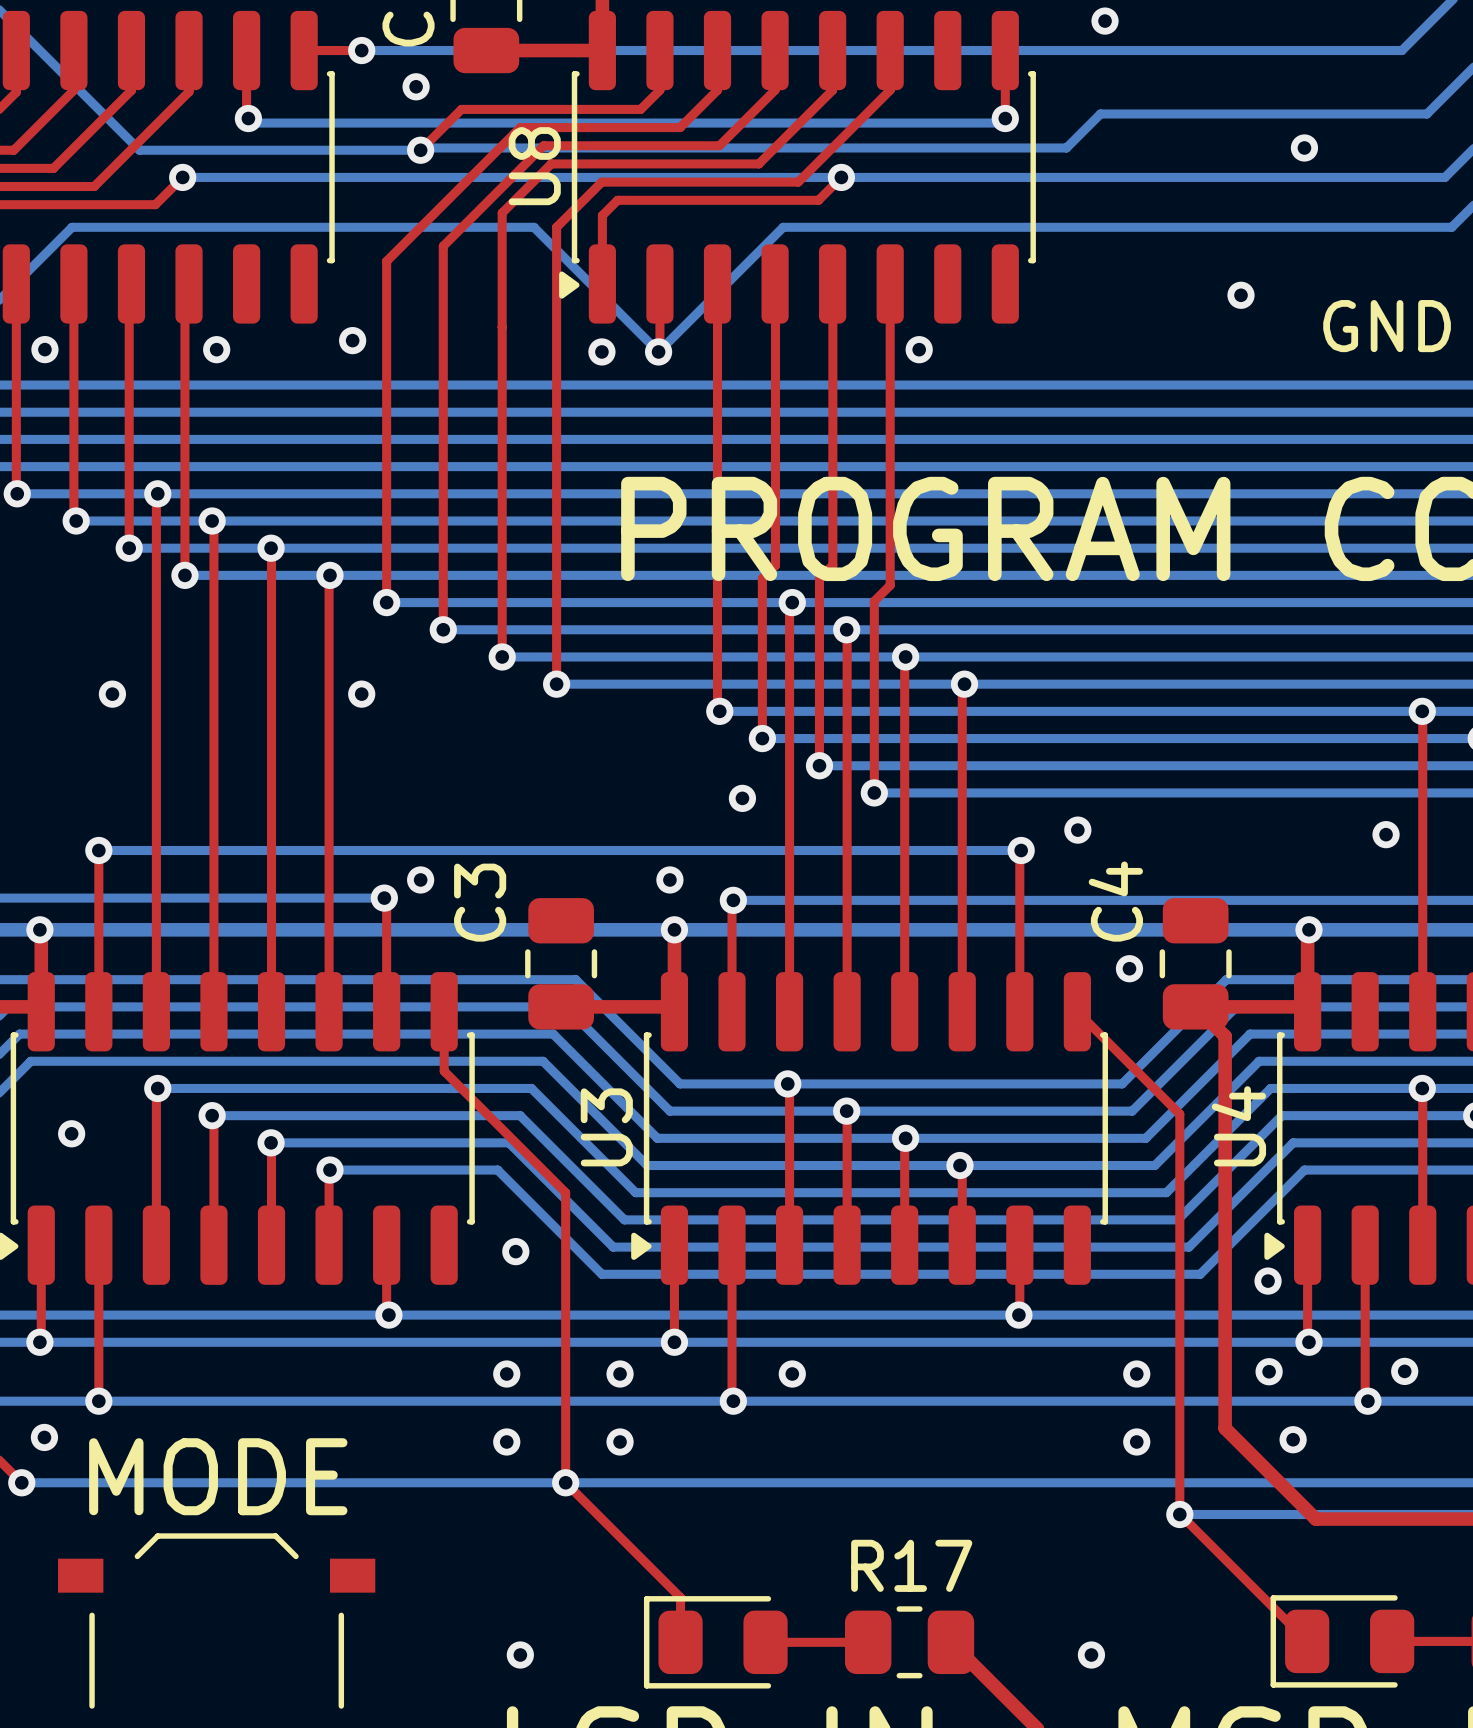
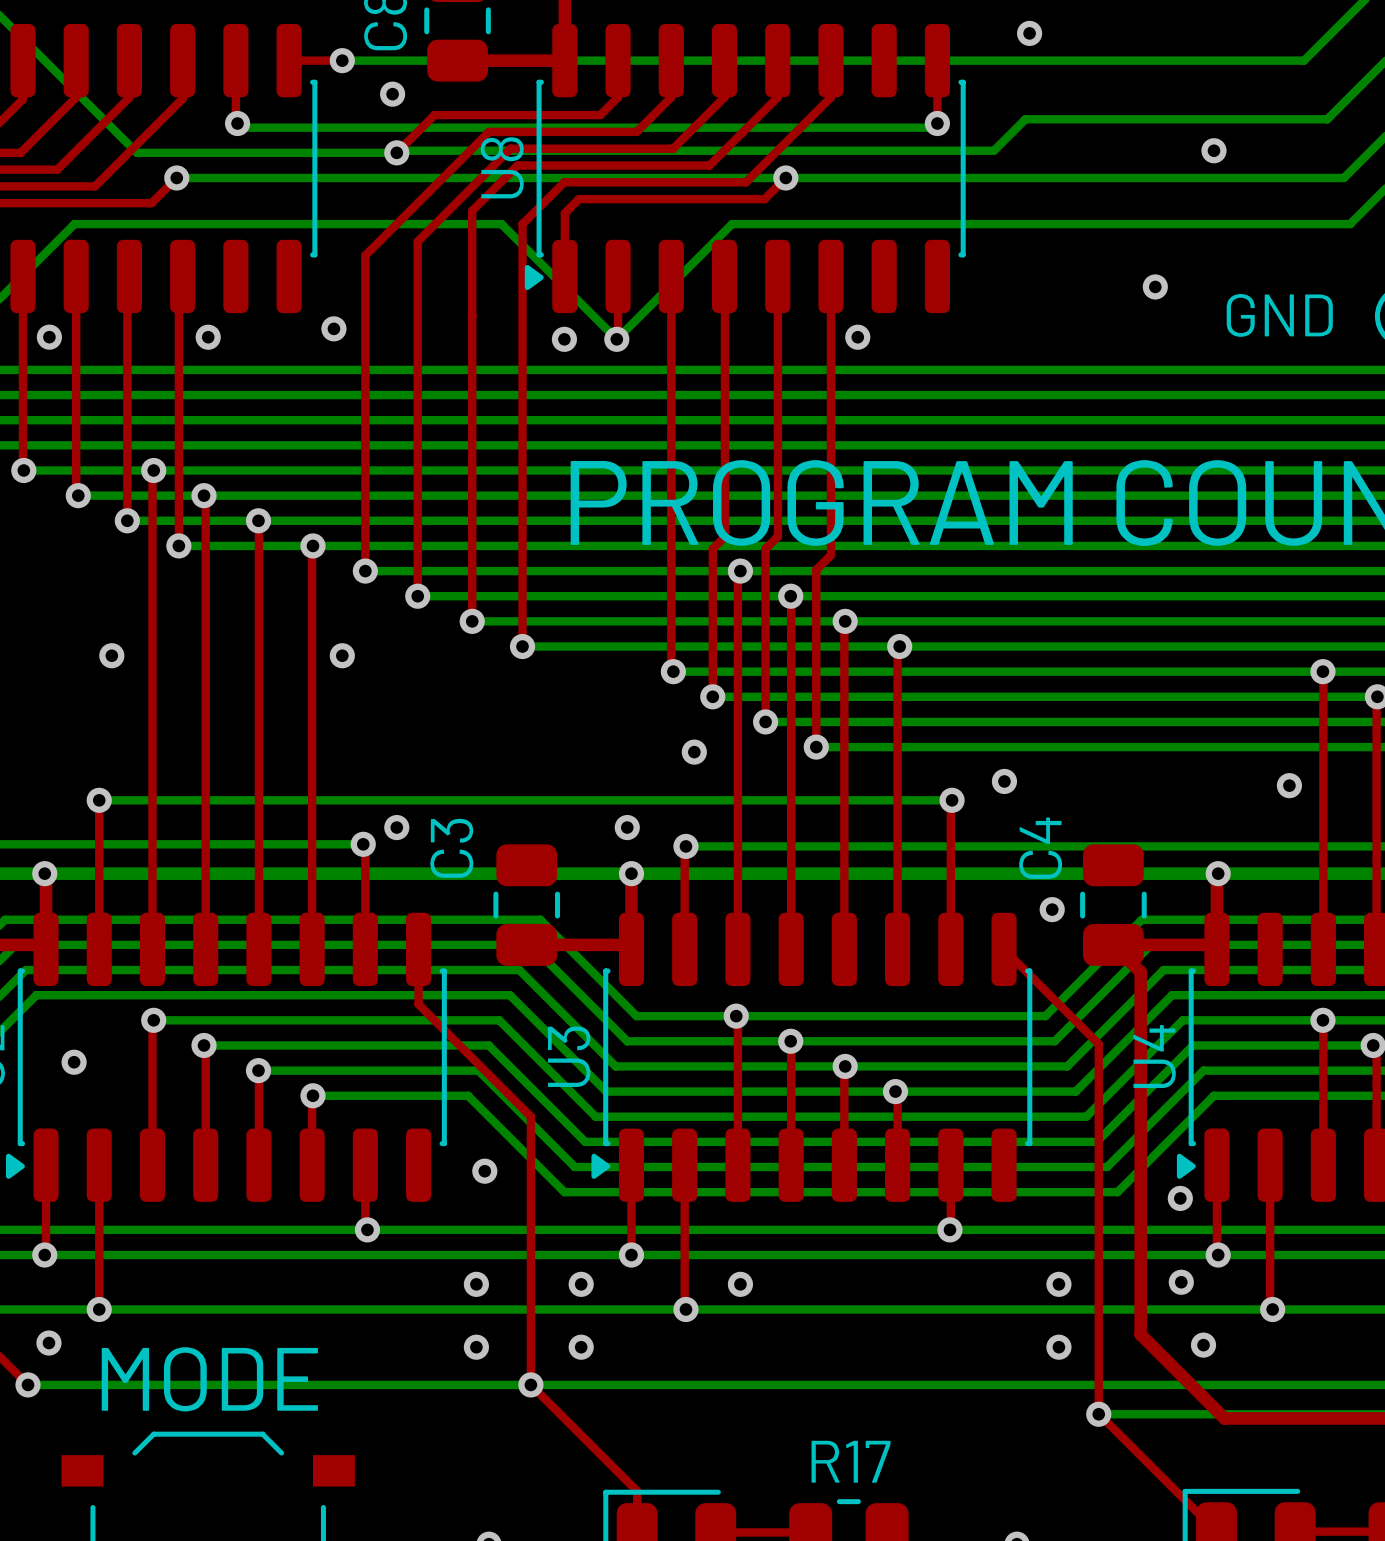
via: (1404, 1371) -> none

